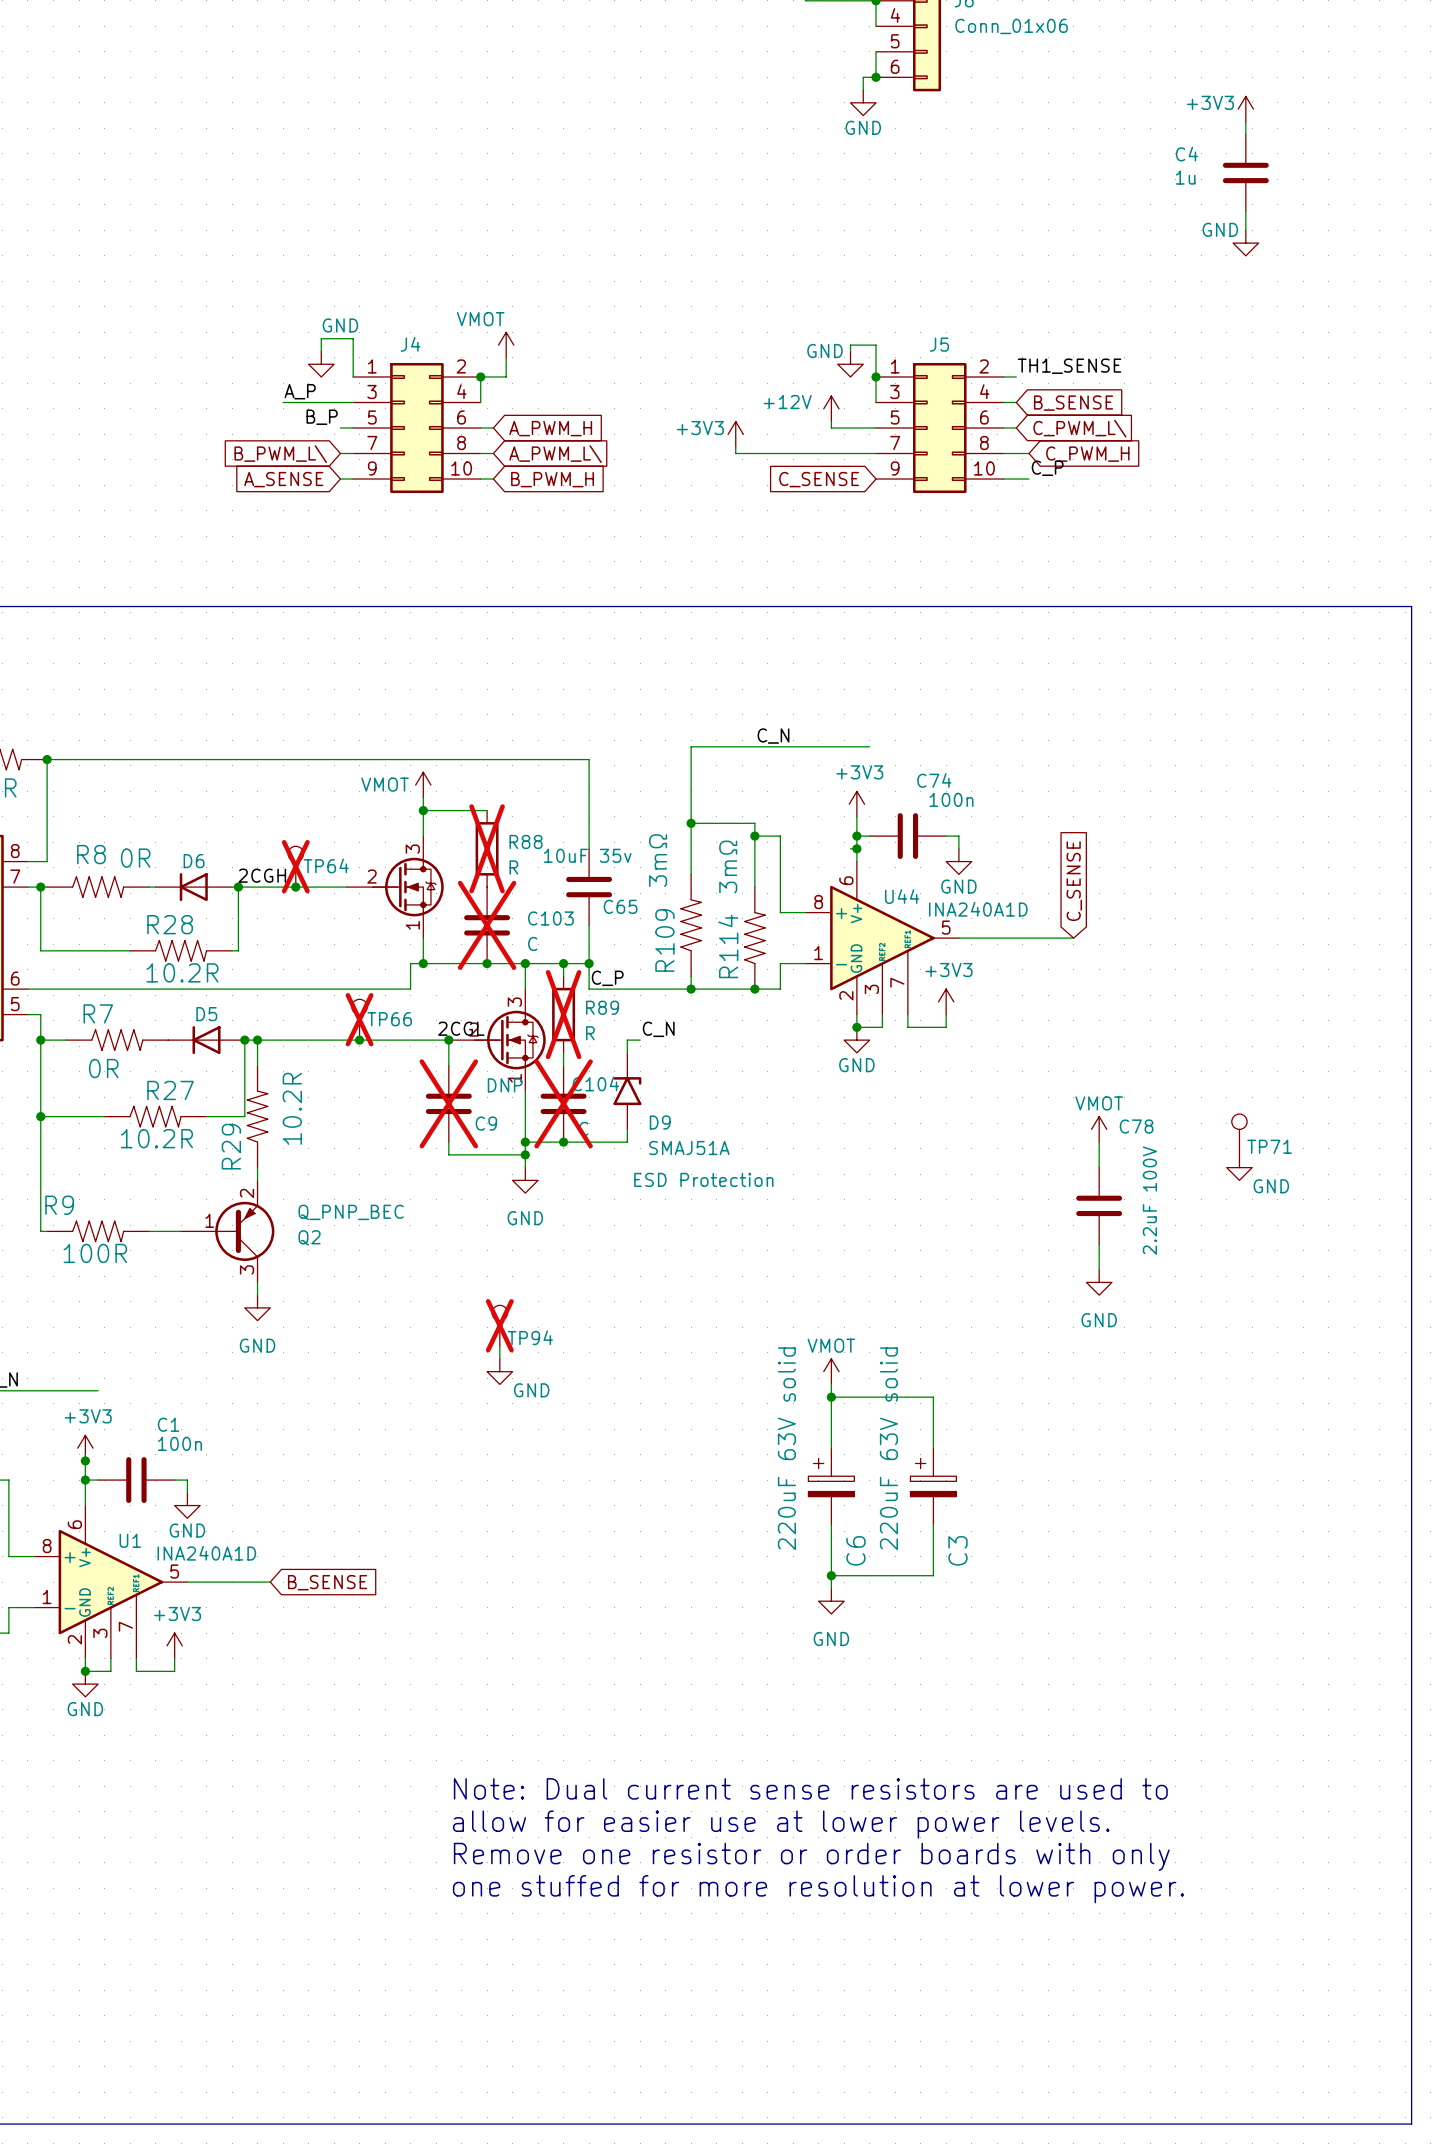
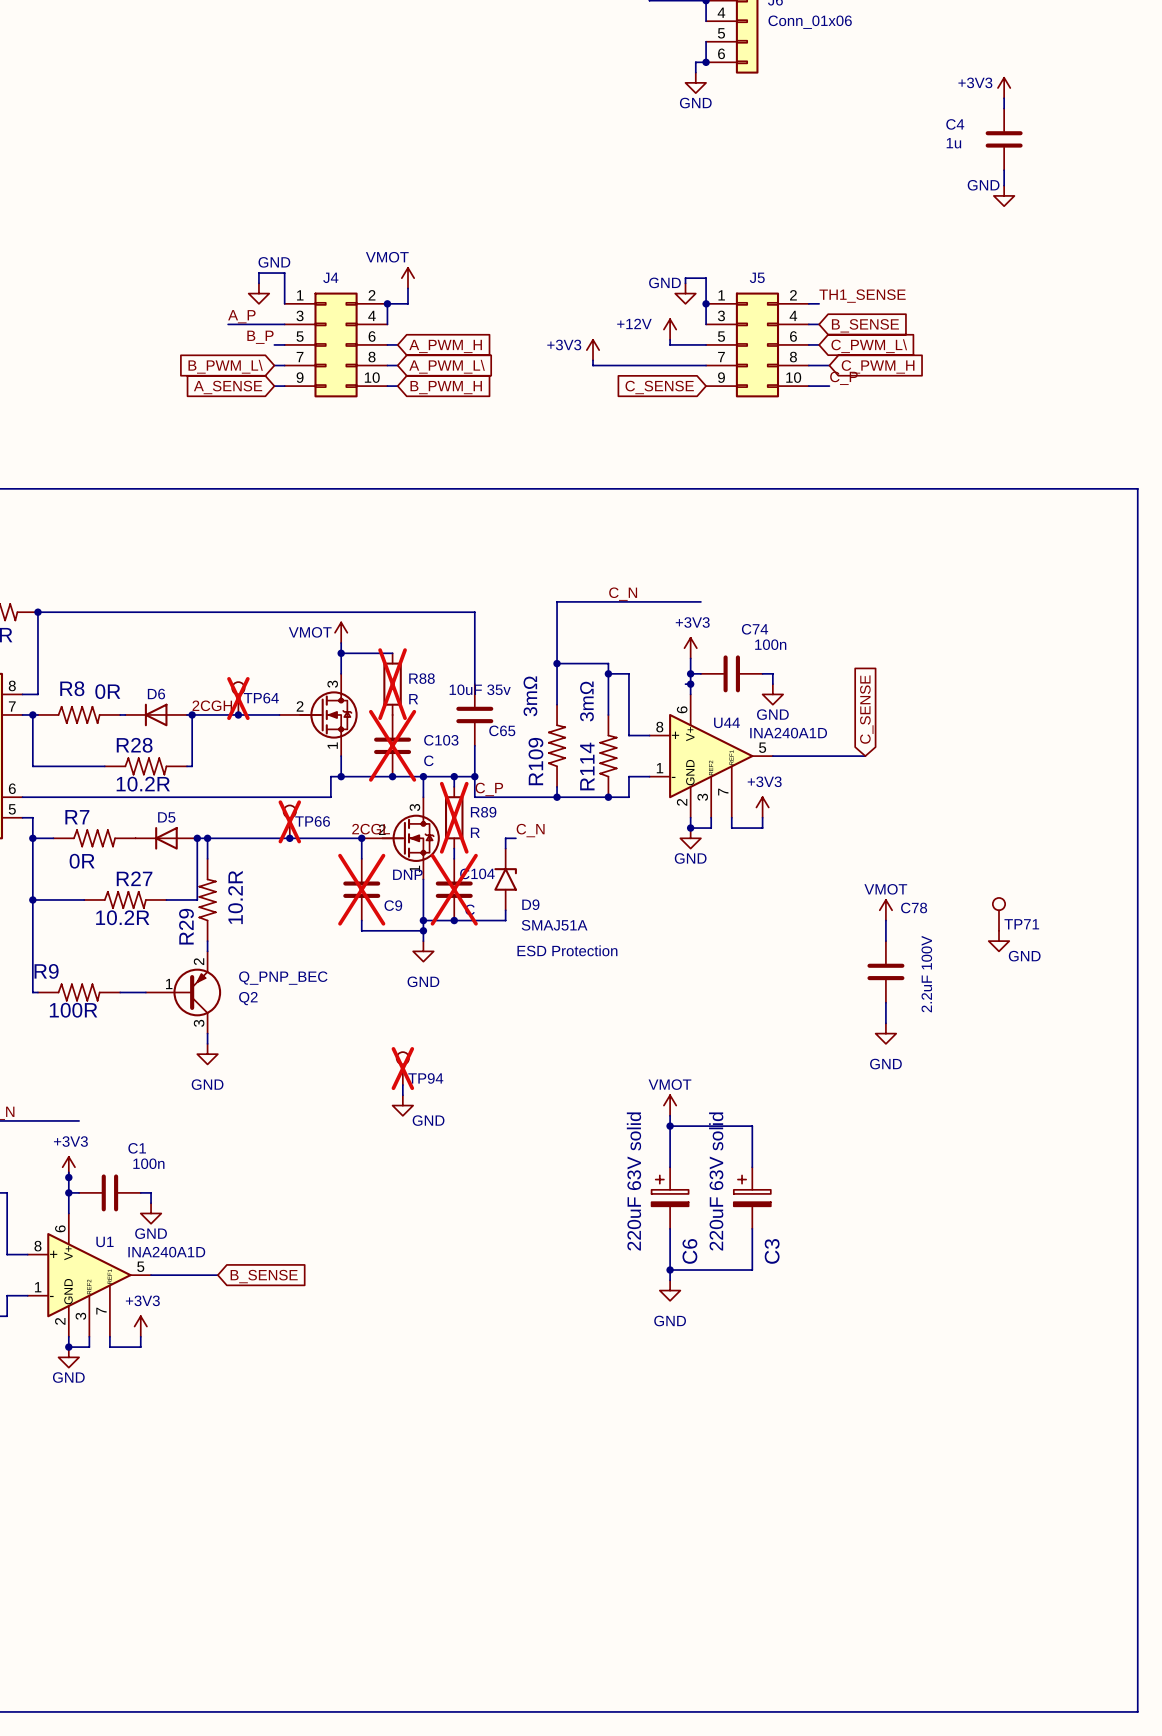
text: Note: Dual current sense resistors are used to (810, 1788) -> none
text: allow for easier use at lower power levels. (781, 1824) -> none
text: Remove one resistor or order boards with only (811, 1856) -> none
text: one stuffed for more resolution at lower power. (818, 1889) -> none

